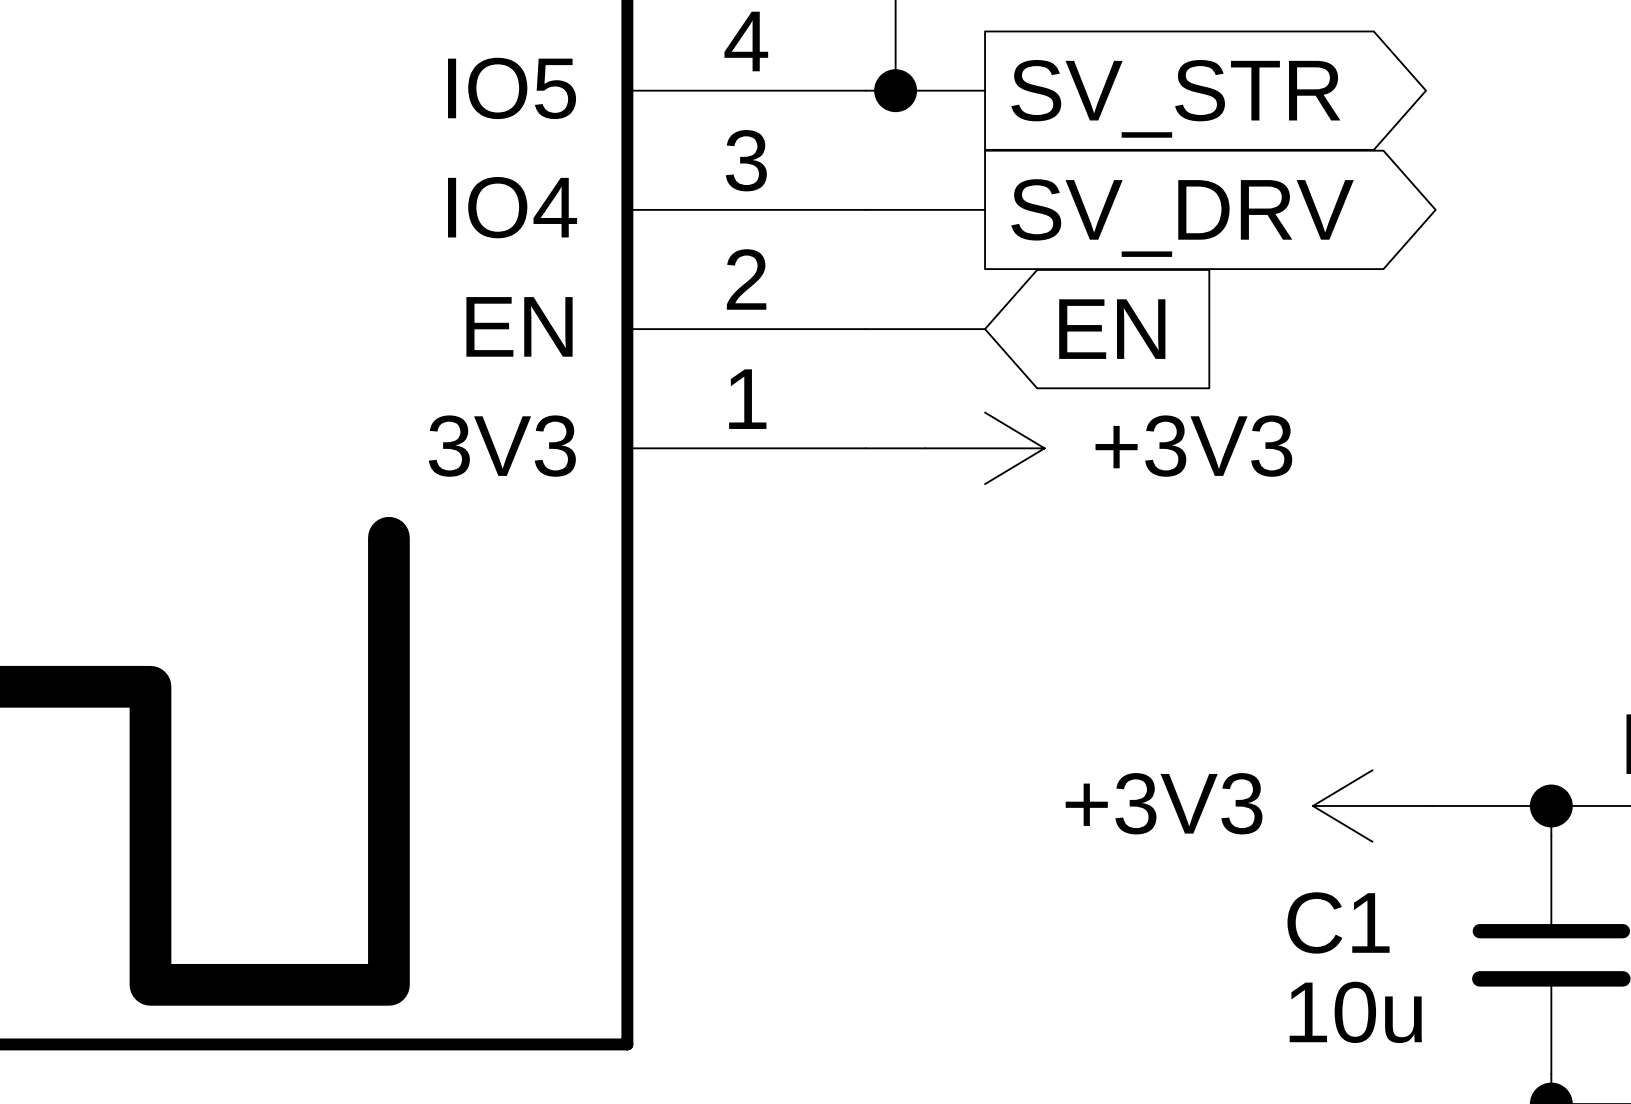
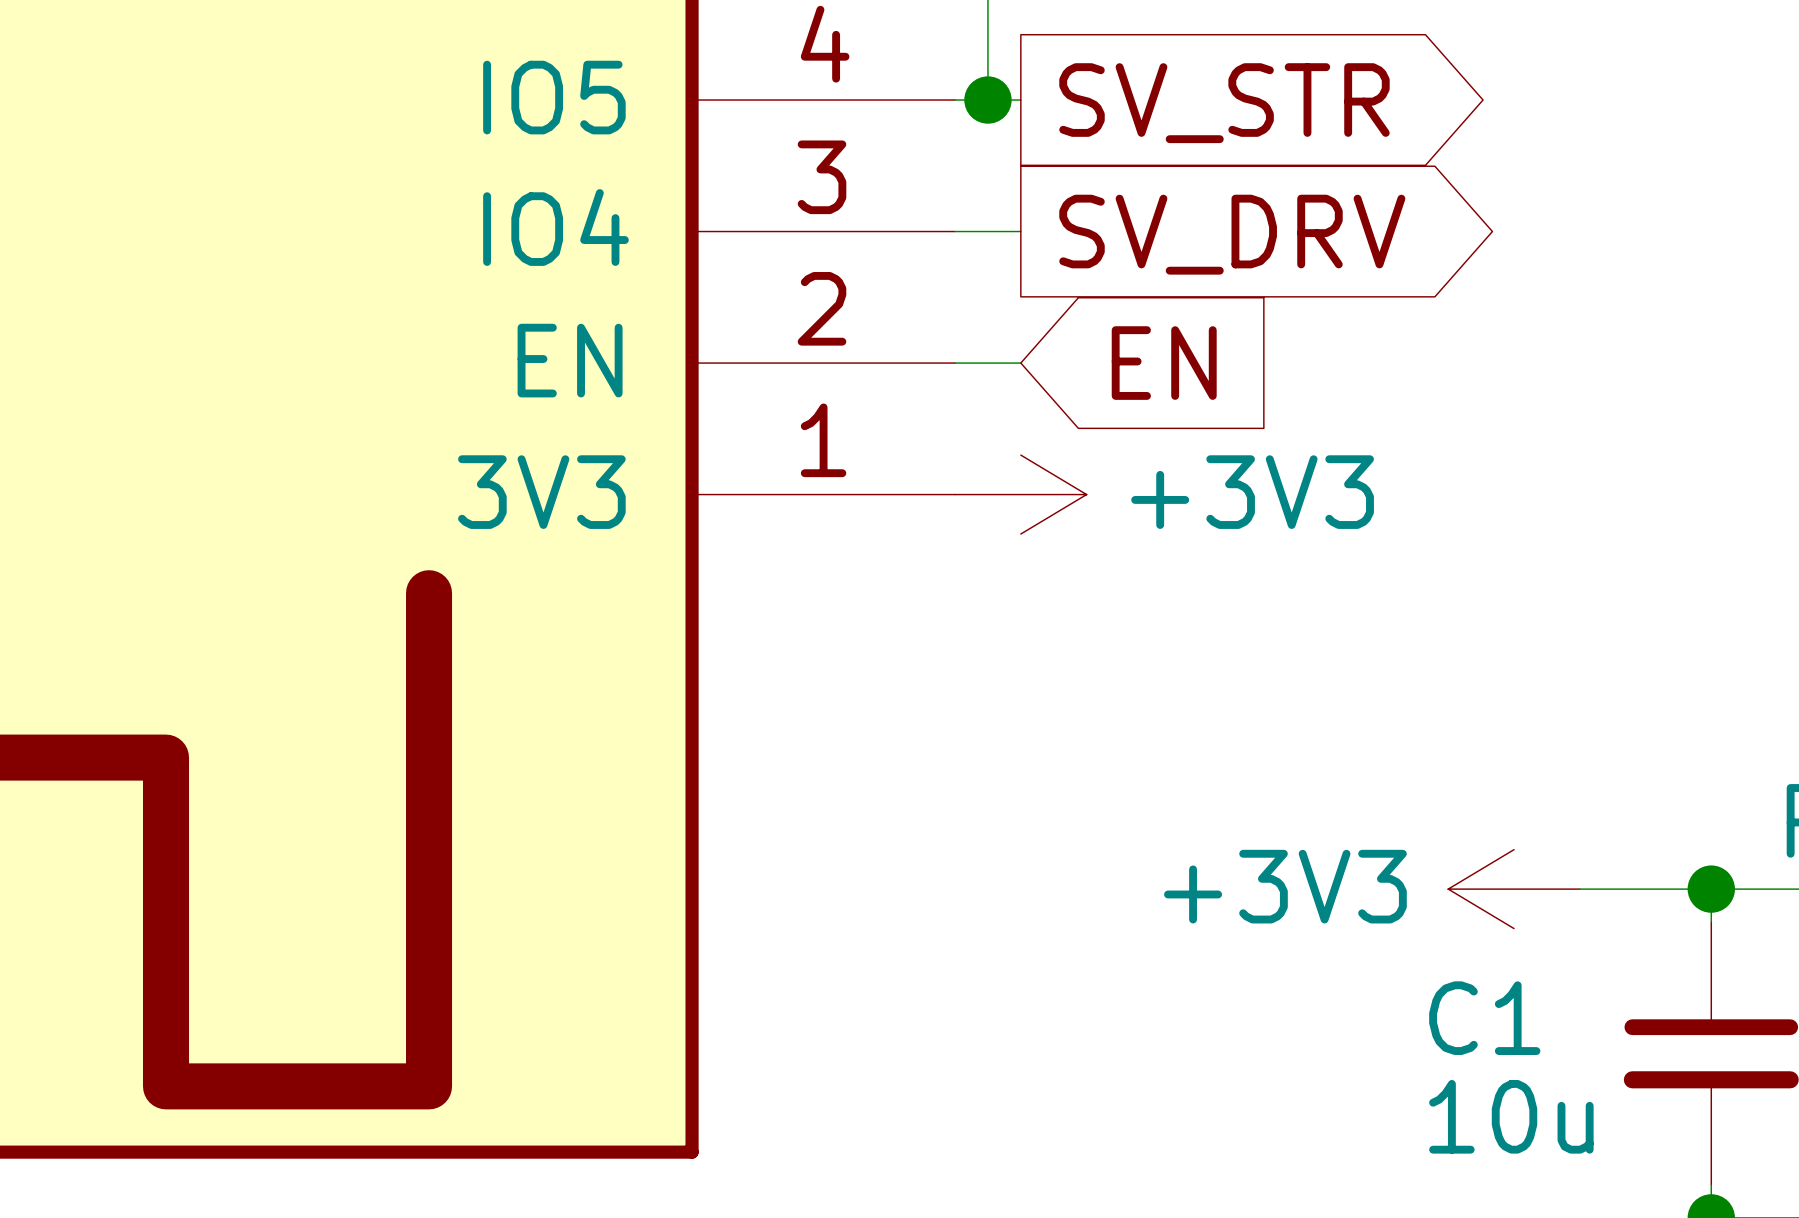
wire: (925, 90) (985, 90) -> none
global label position: SV_STR (1175, 98) -> SV_STR (1224, 103)
wire: (925, 209) (985, 209) -> none
global label position: SV_DRV (1182, 218) -> SV_DRV (1232, 234)
wire: (925, 329) (985, 329) -> none
global label position: EN (1112, 329) -> EN (1164, 363)
power symbol position: +3V3 (985, 448) -> +3V3 (1020, 494)

